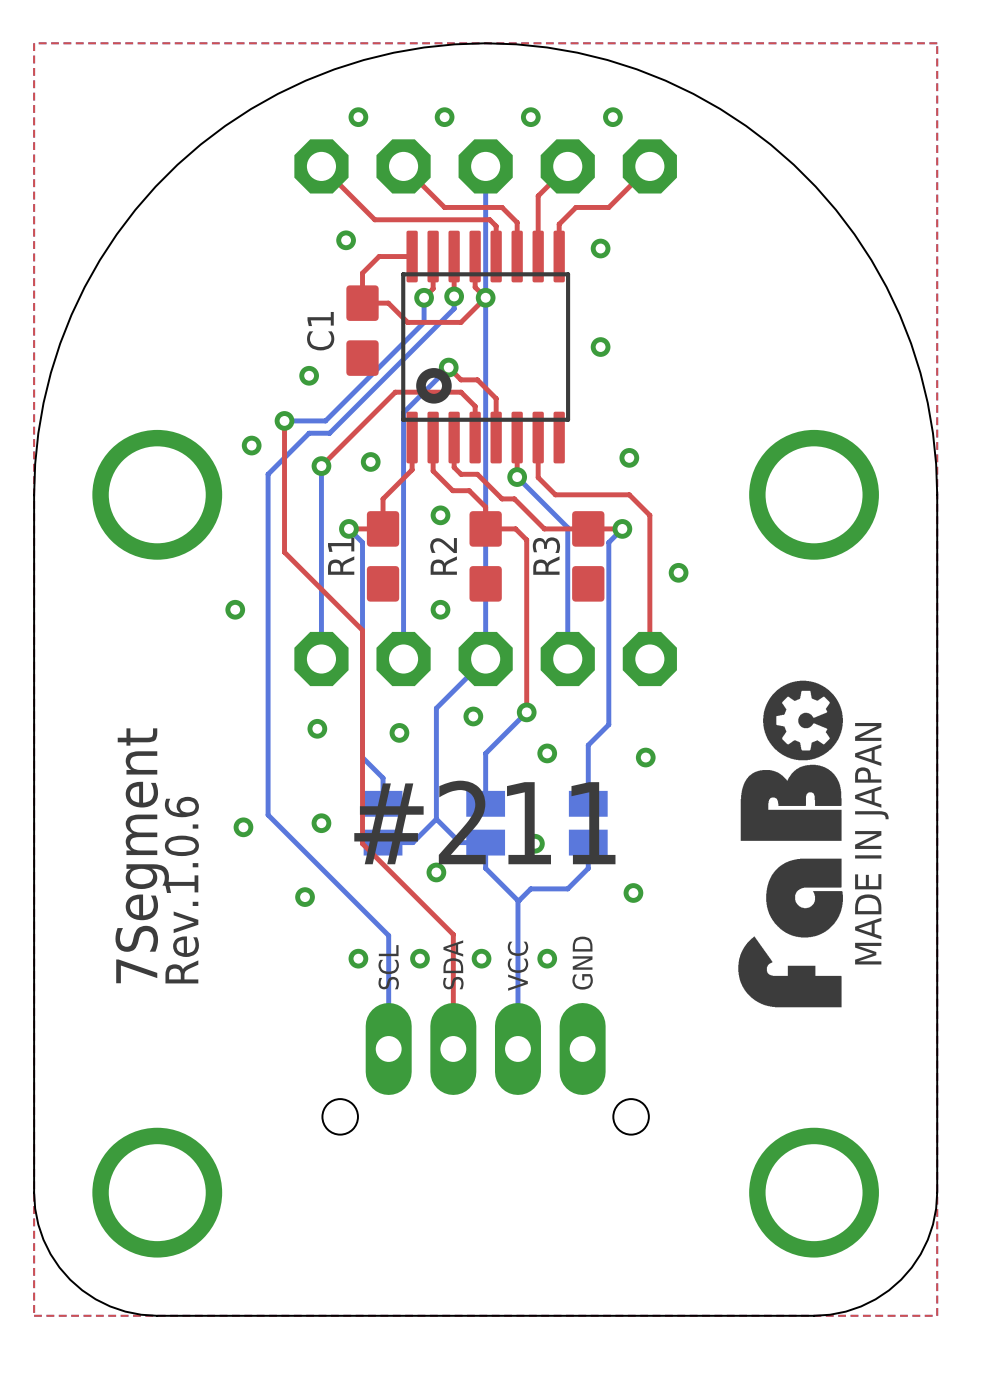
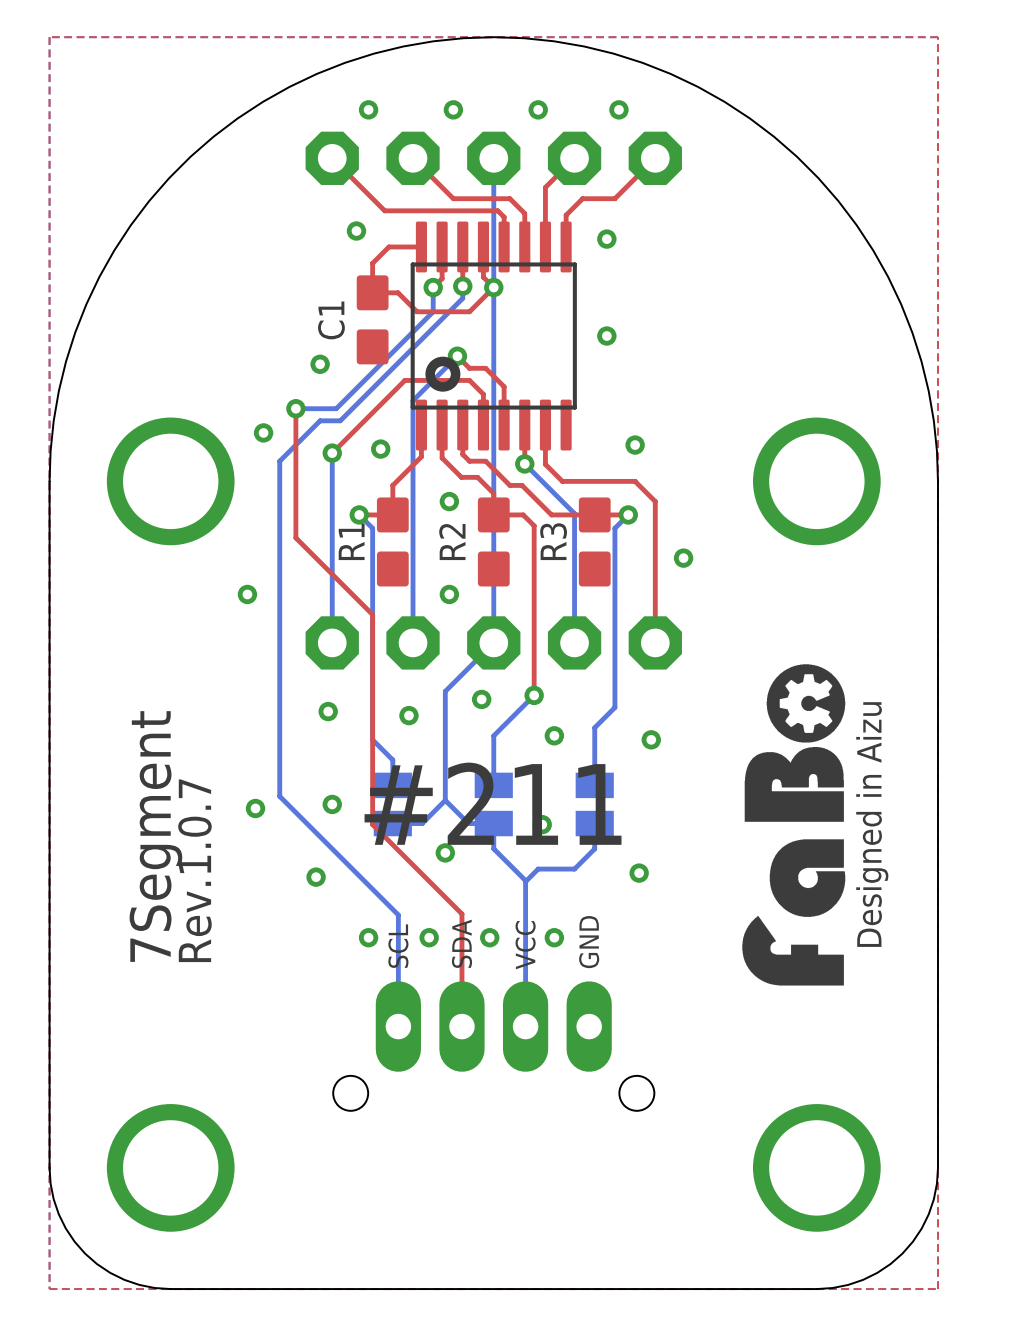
text: MADE IN JAPAN (871, 843) -> Designed in Aizu (872, 824)
text: Rev.1.0.6 (181, 890) -> Rev.1.0.7 (194, 870)

